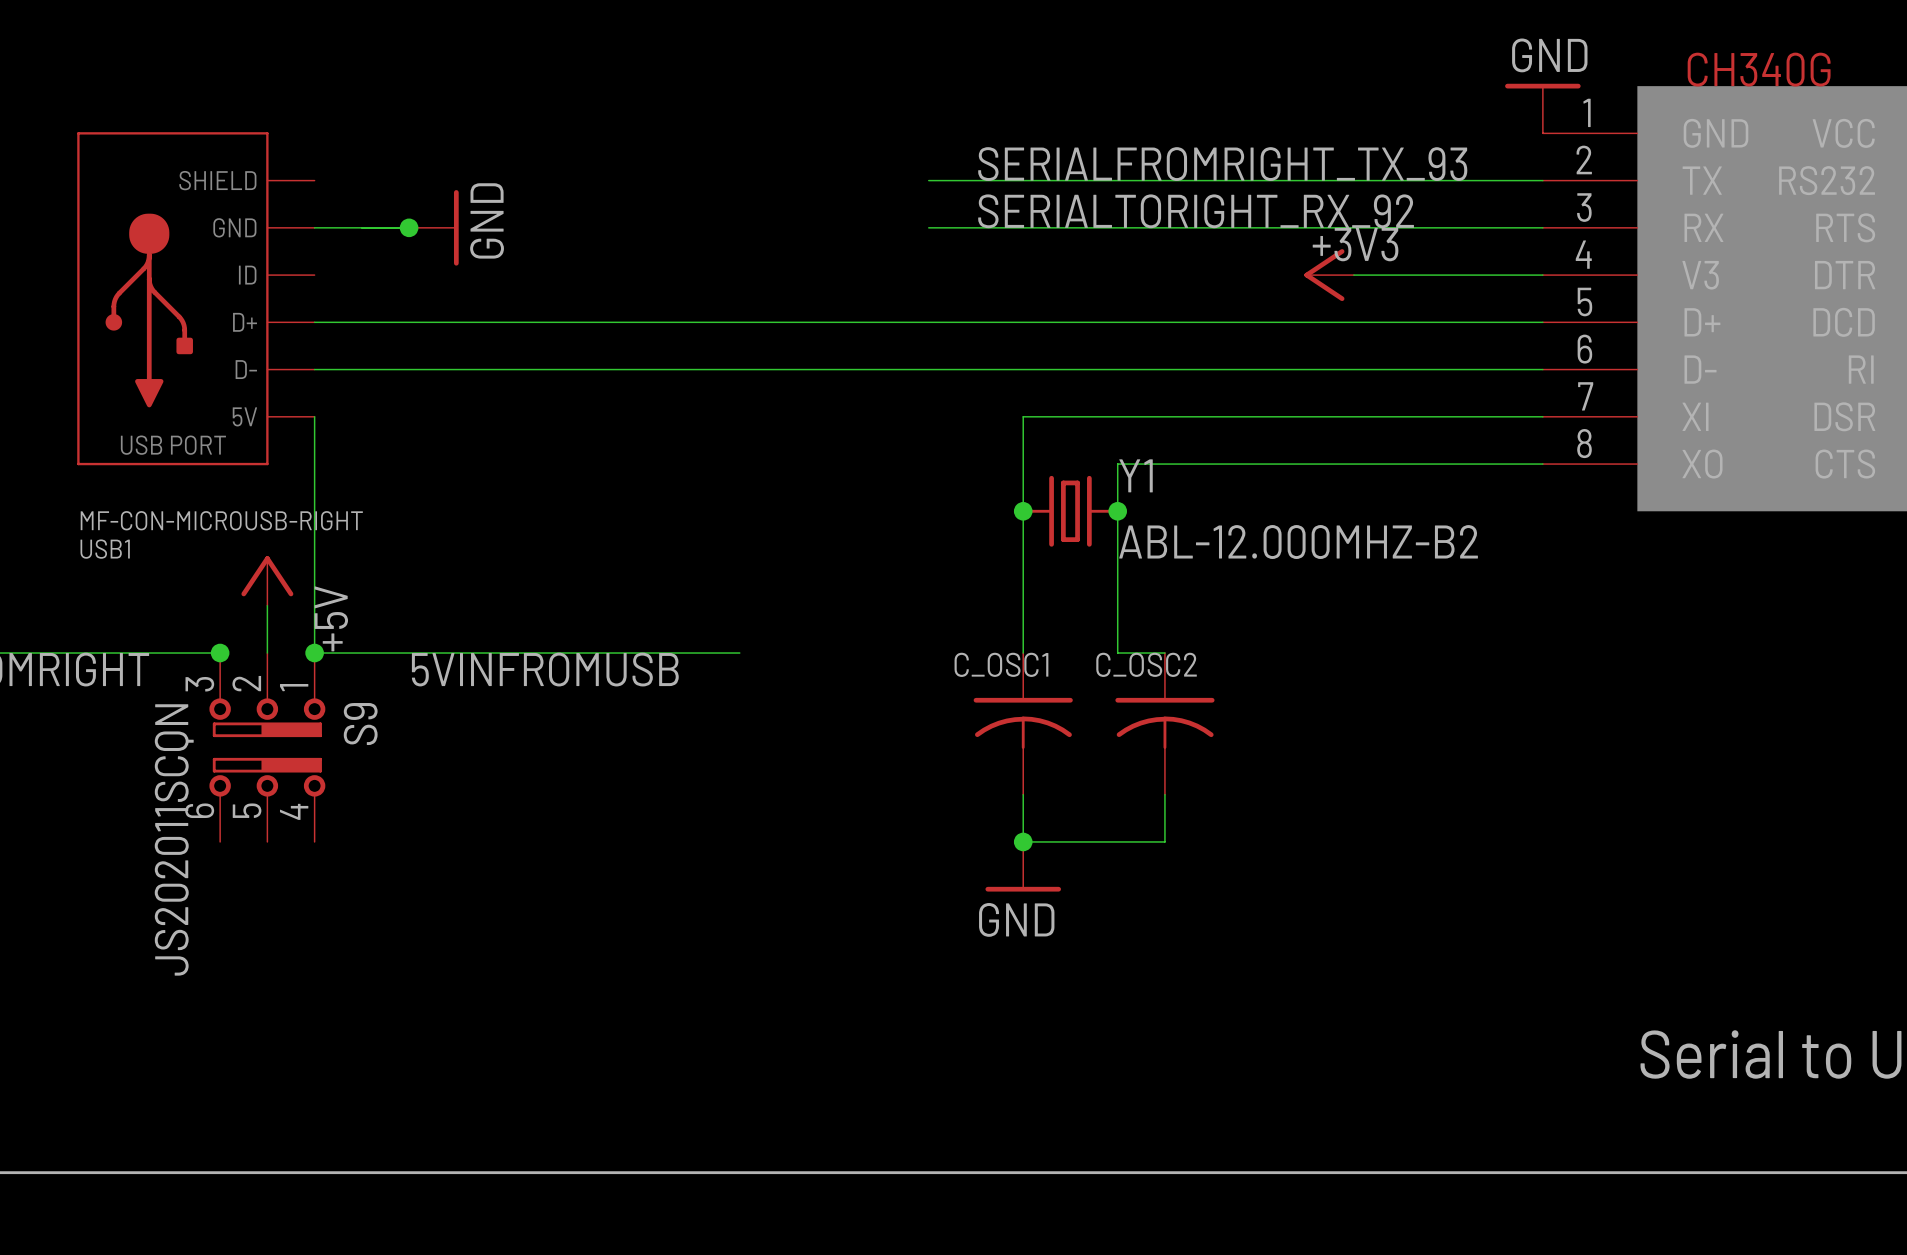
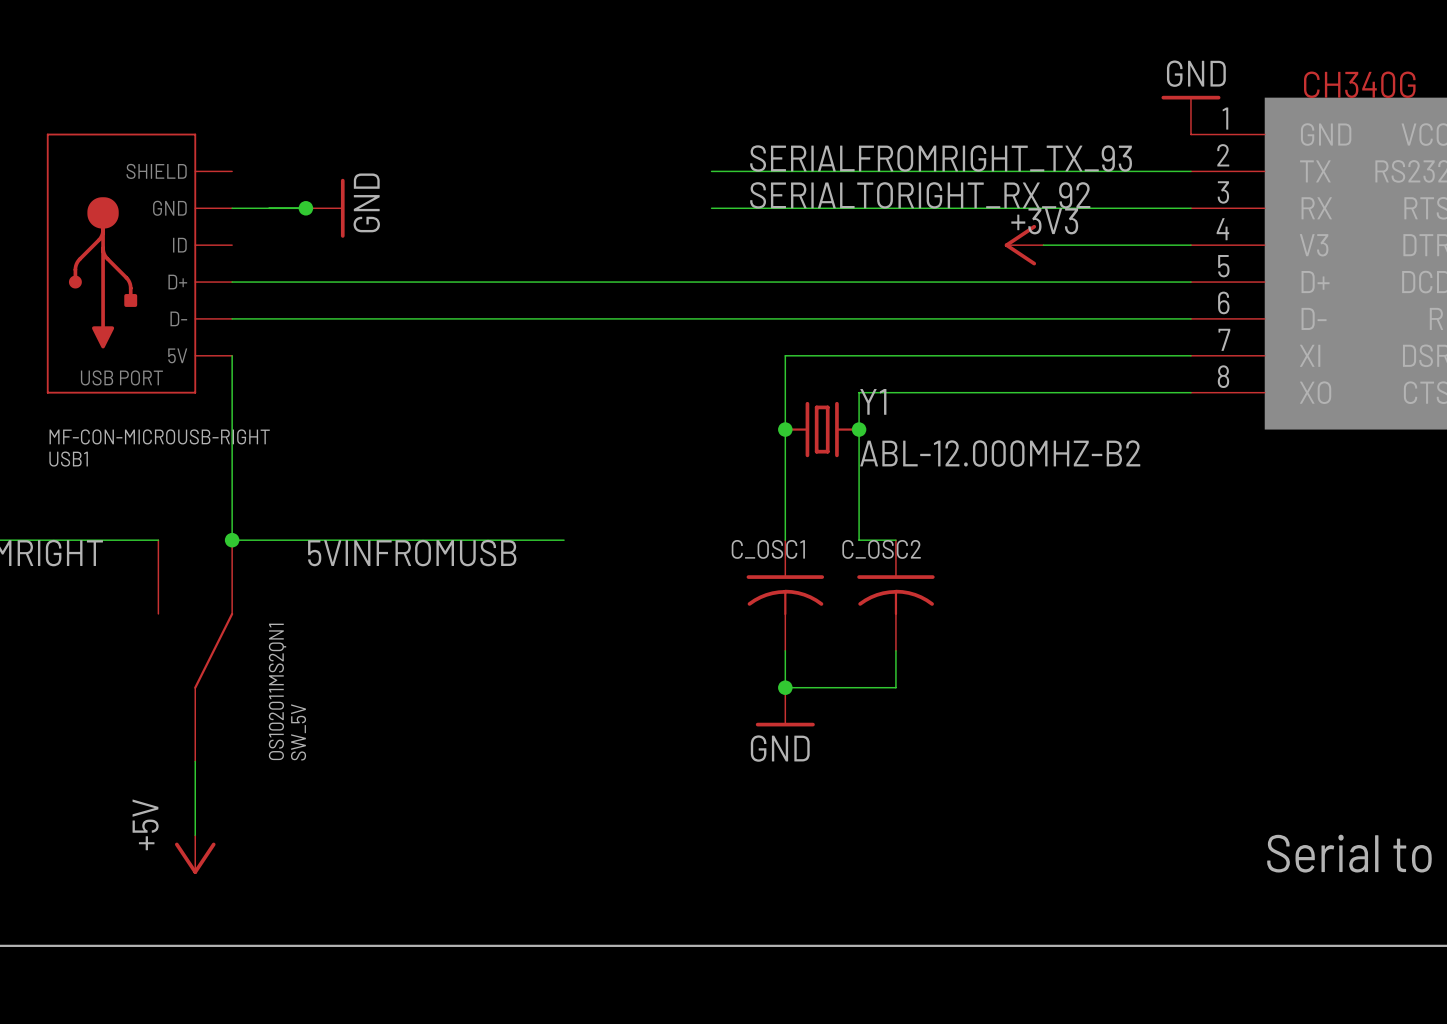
power symbol: +5V (267, 580) -> none
wire: (267, 605) (267, 653) -> none
junction: (220, 653) -> none
S9: JS202011SCQN (267, 747) -> none
SW_5V: none -> OS102011MS2QN1 (195, 650)
wire: none -> (195, 761) (195, 835)
power symbol: none -> +5V (195, 854)

